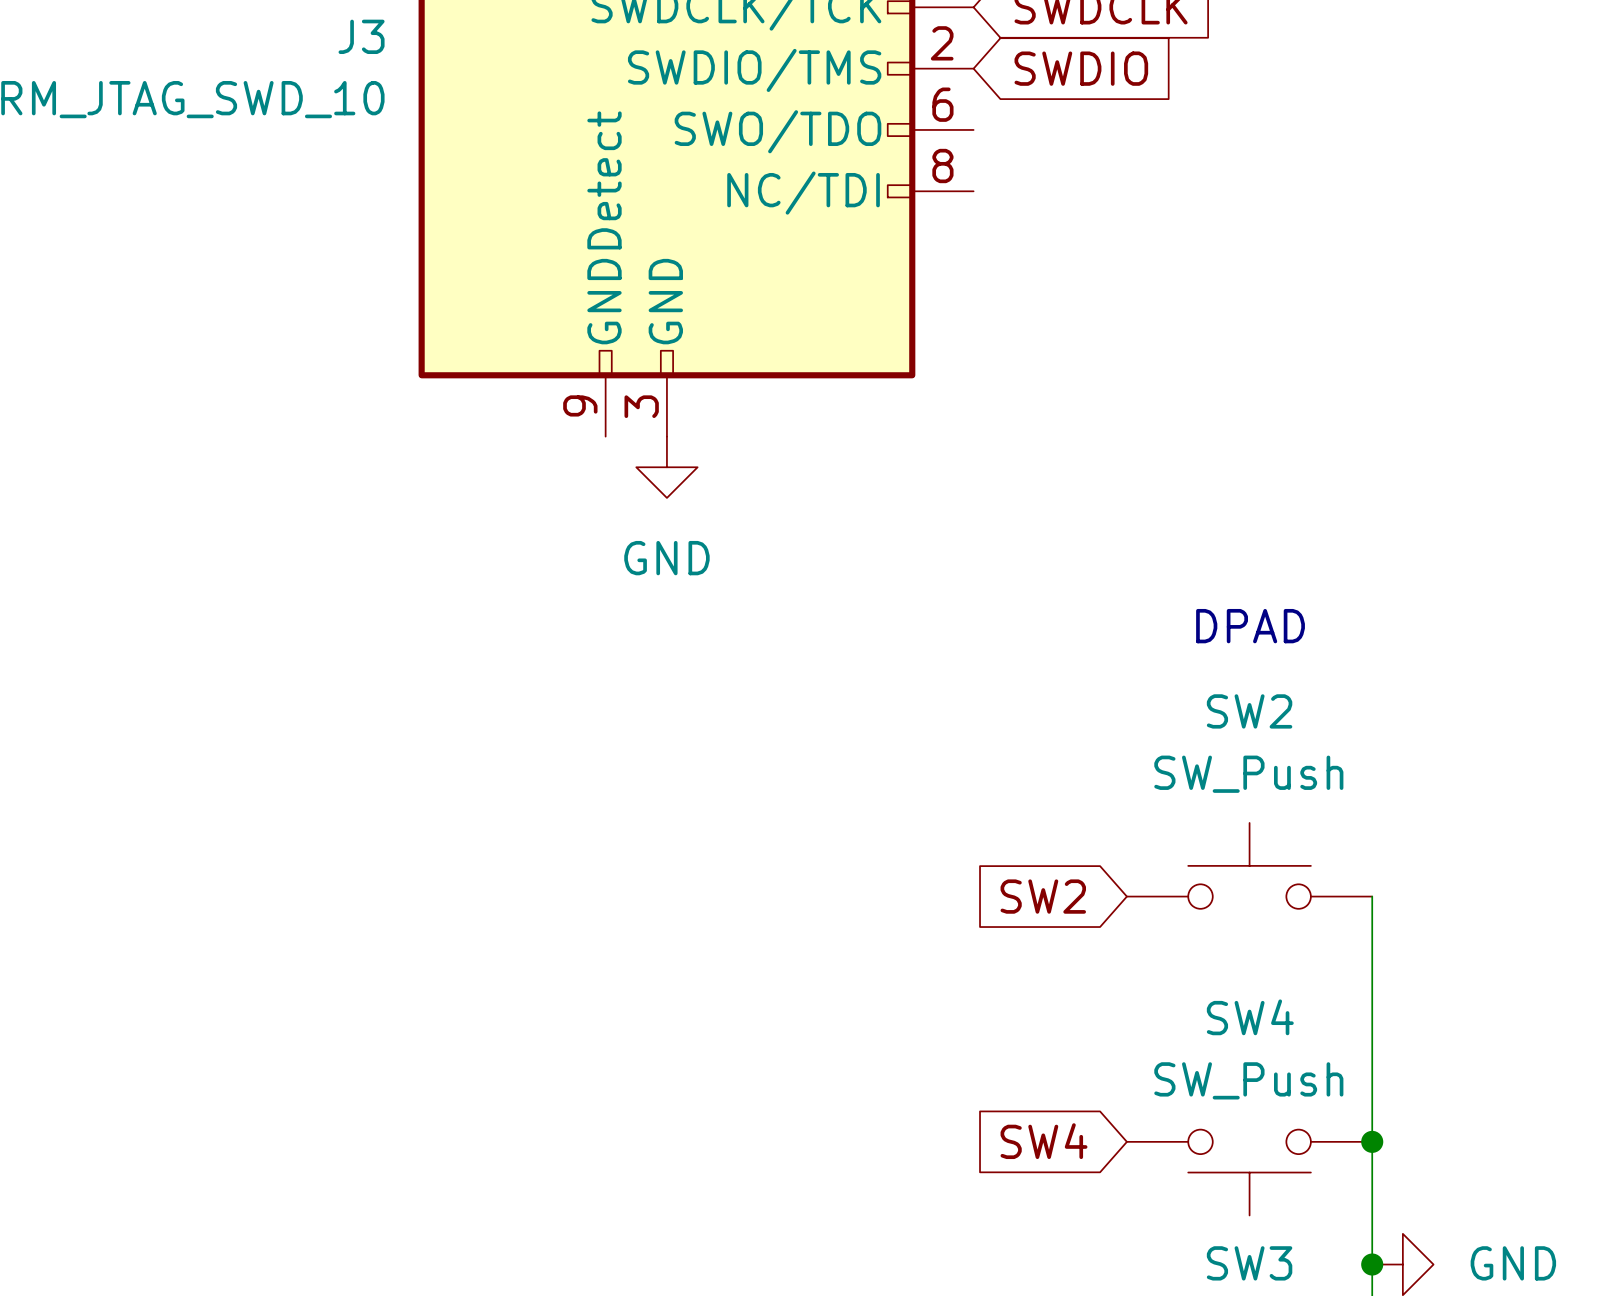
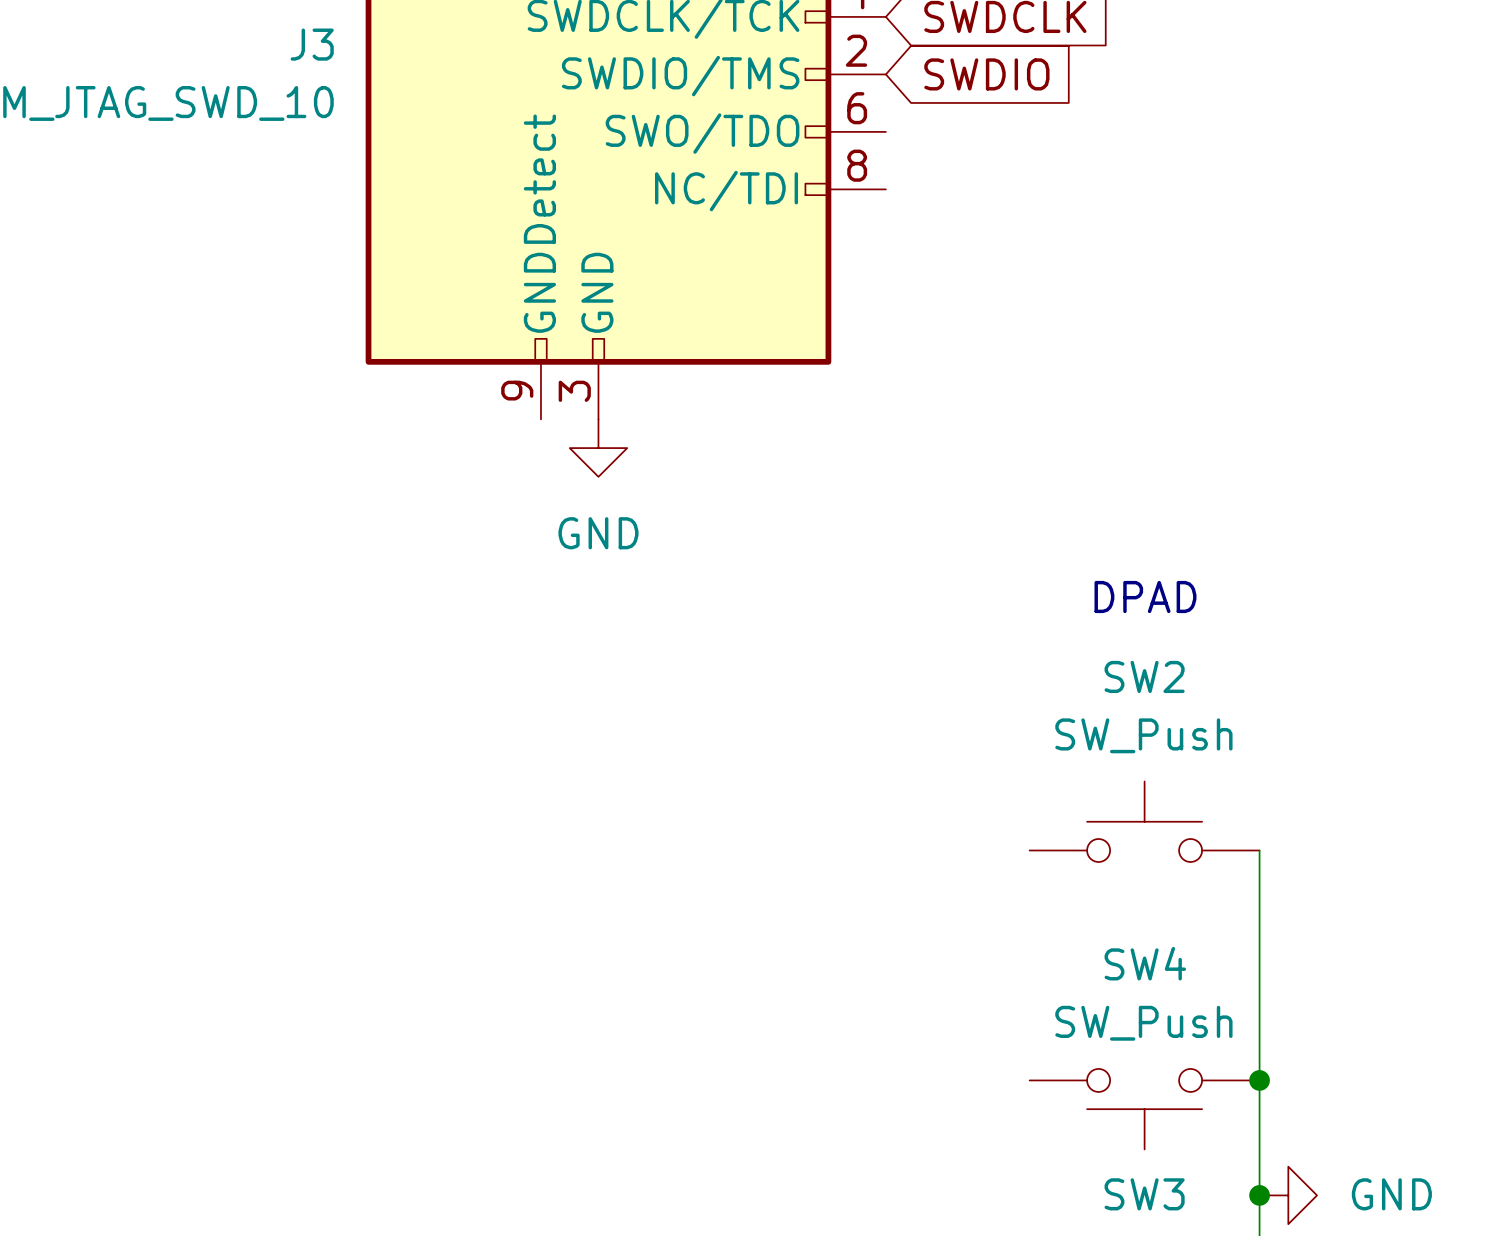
global label: SW2 (1043, 896) -> none
global label: SW4 (1044, 1141) -> none

